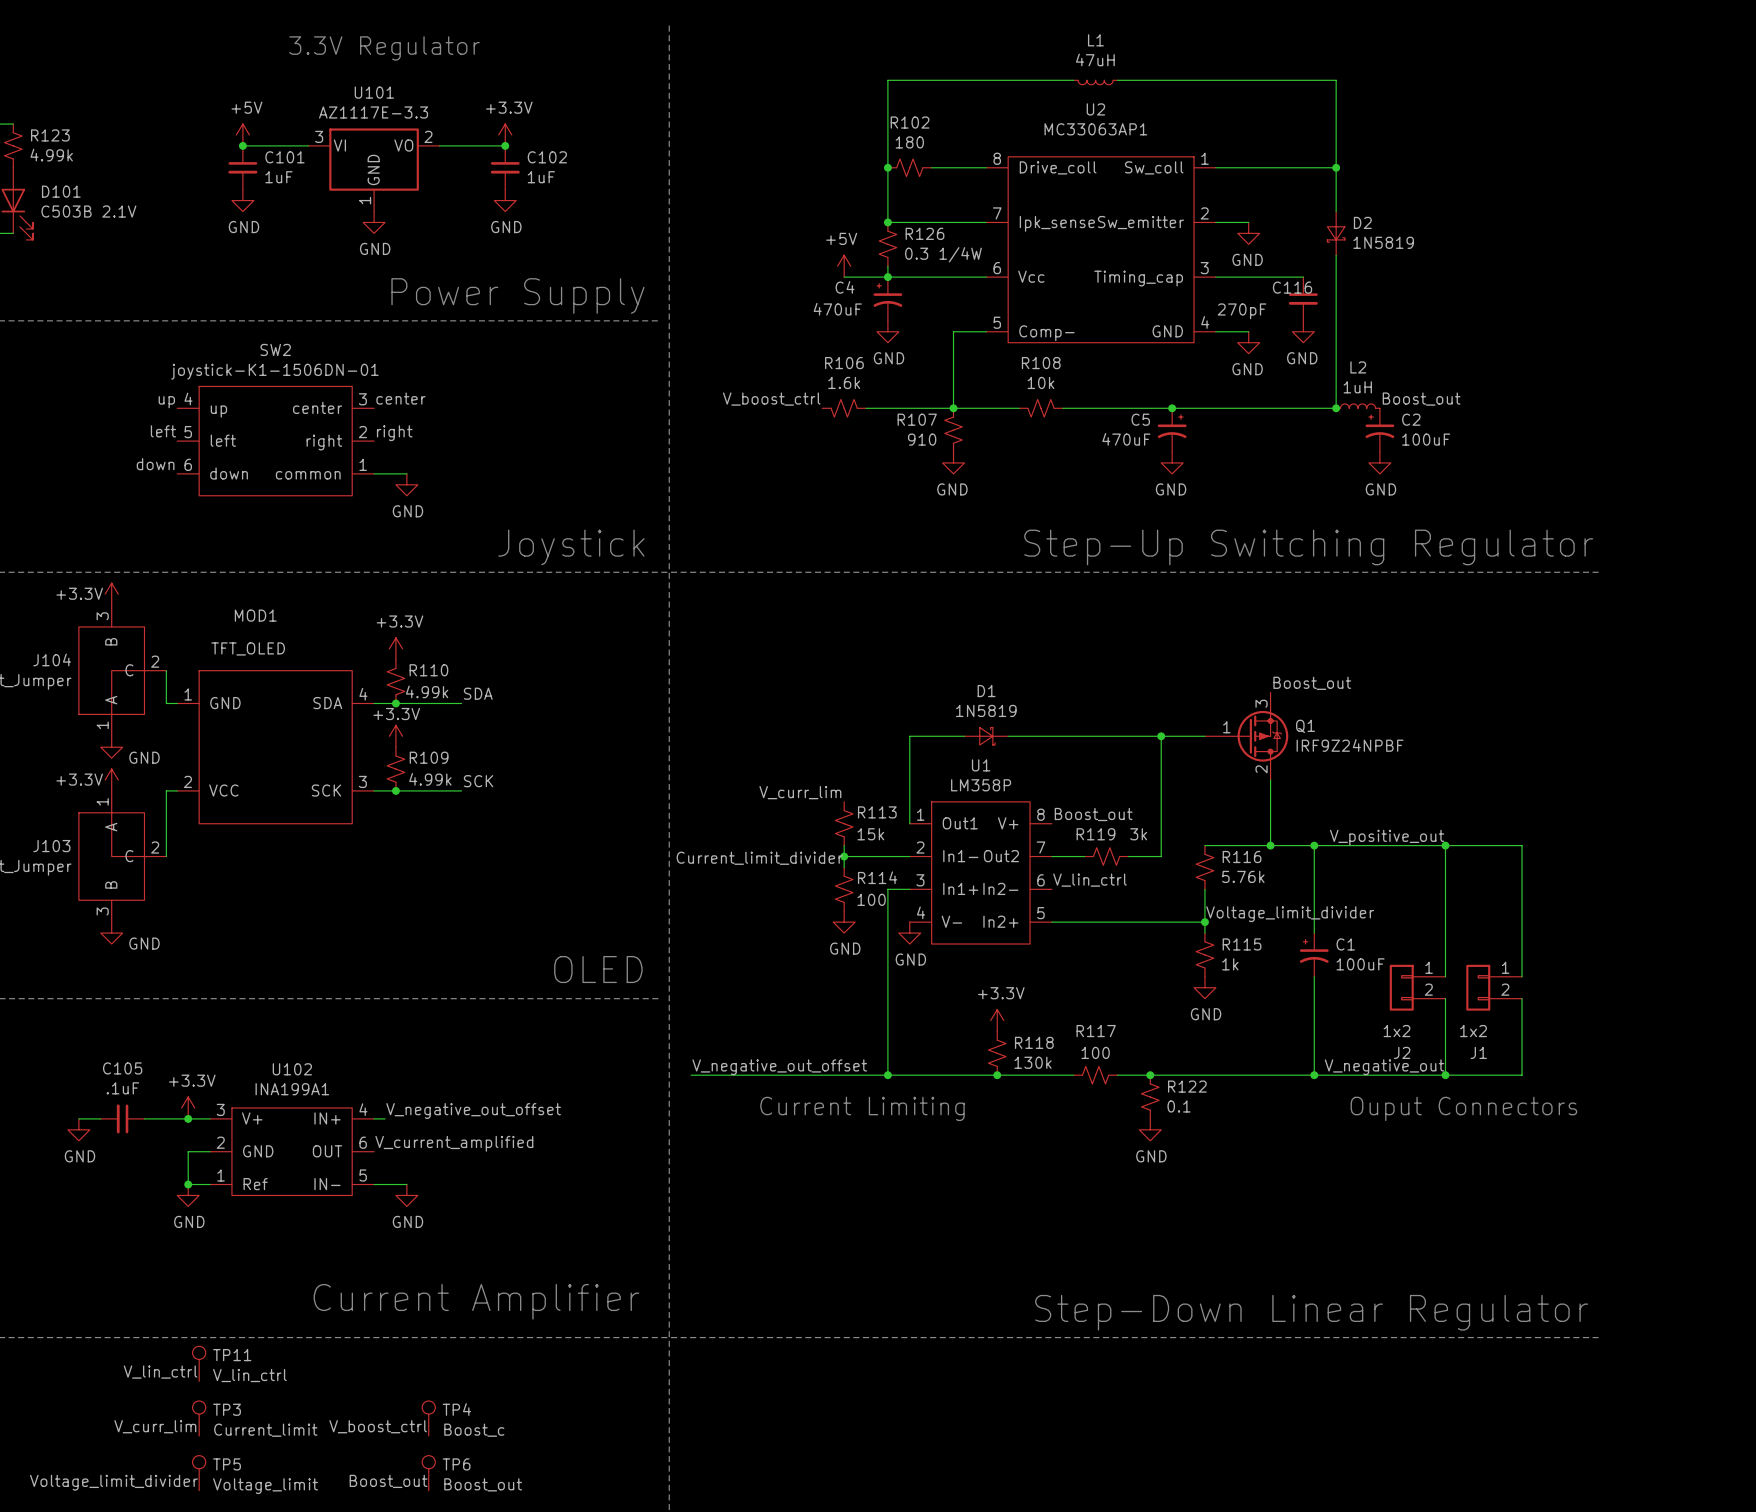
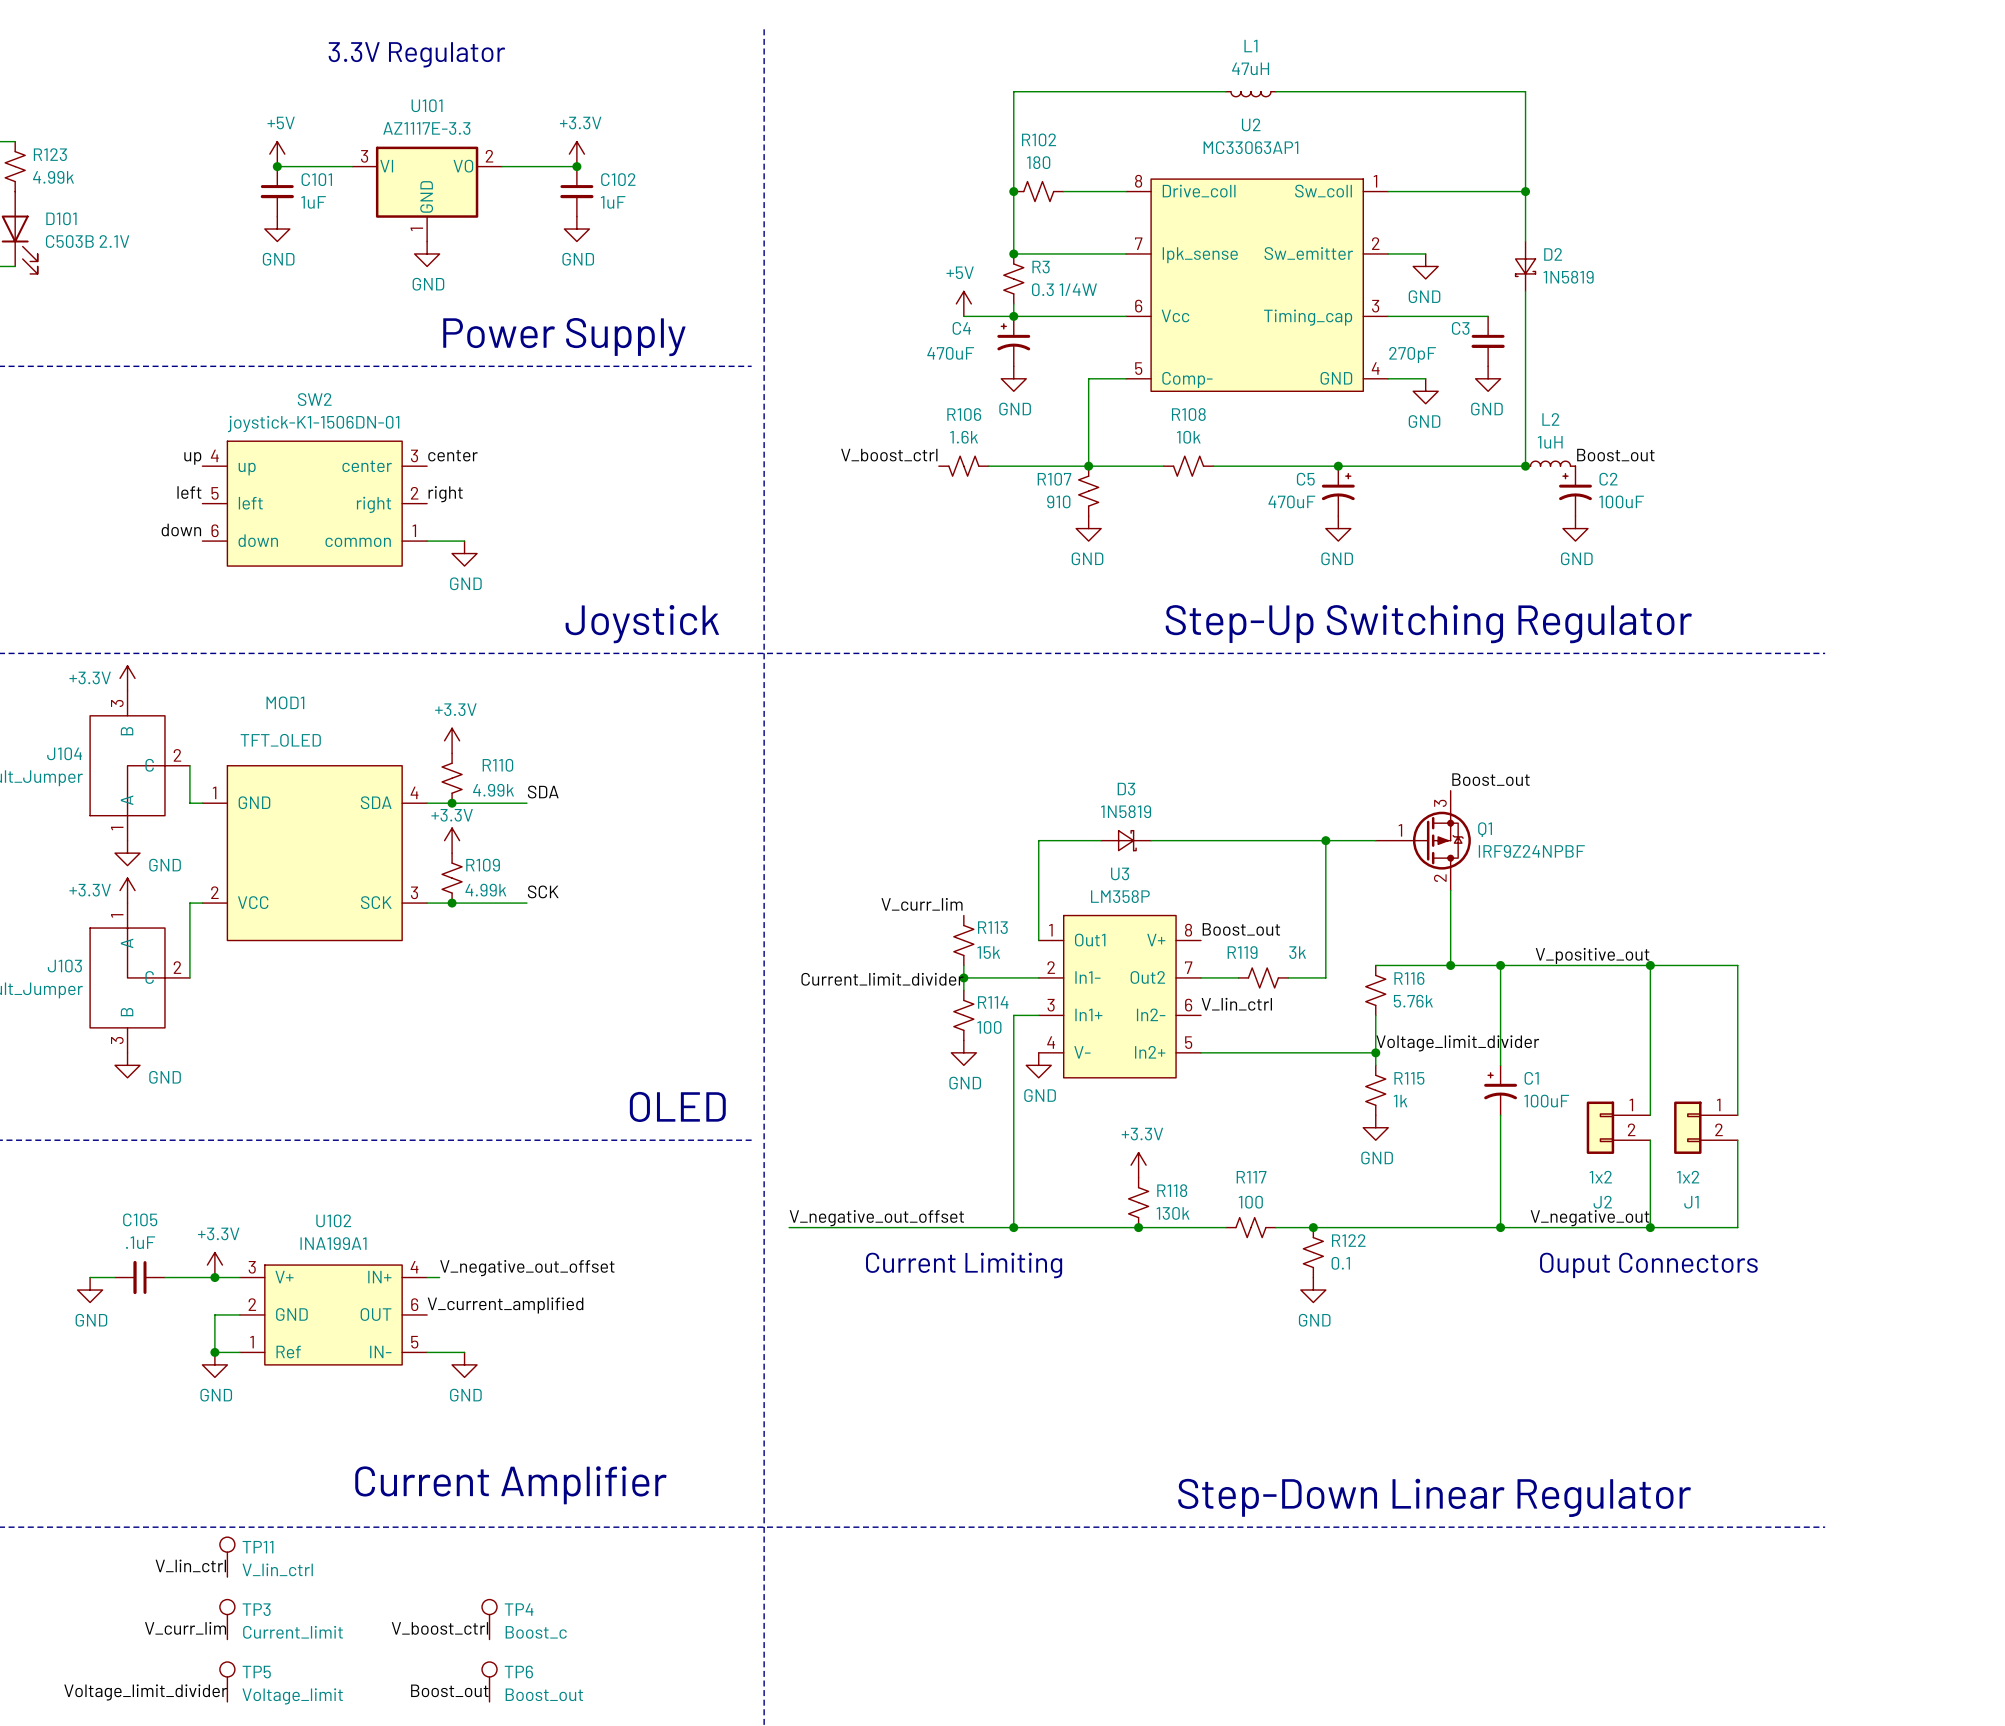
R126 name: R126 (924, 233) -> R3 (1041, 267)
C116 name: C116 (1292, 287) -> C3 (1460, 328)
D1 name: D1 (986, 691) -> D3 (1126, 789)
U1 name: U1 (981, 765) -> U3 (1120, 873)

